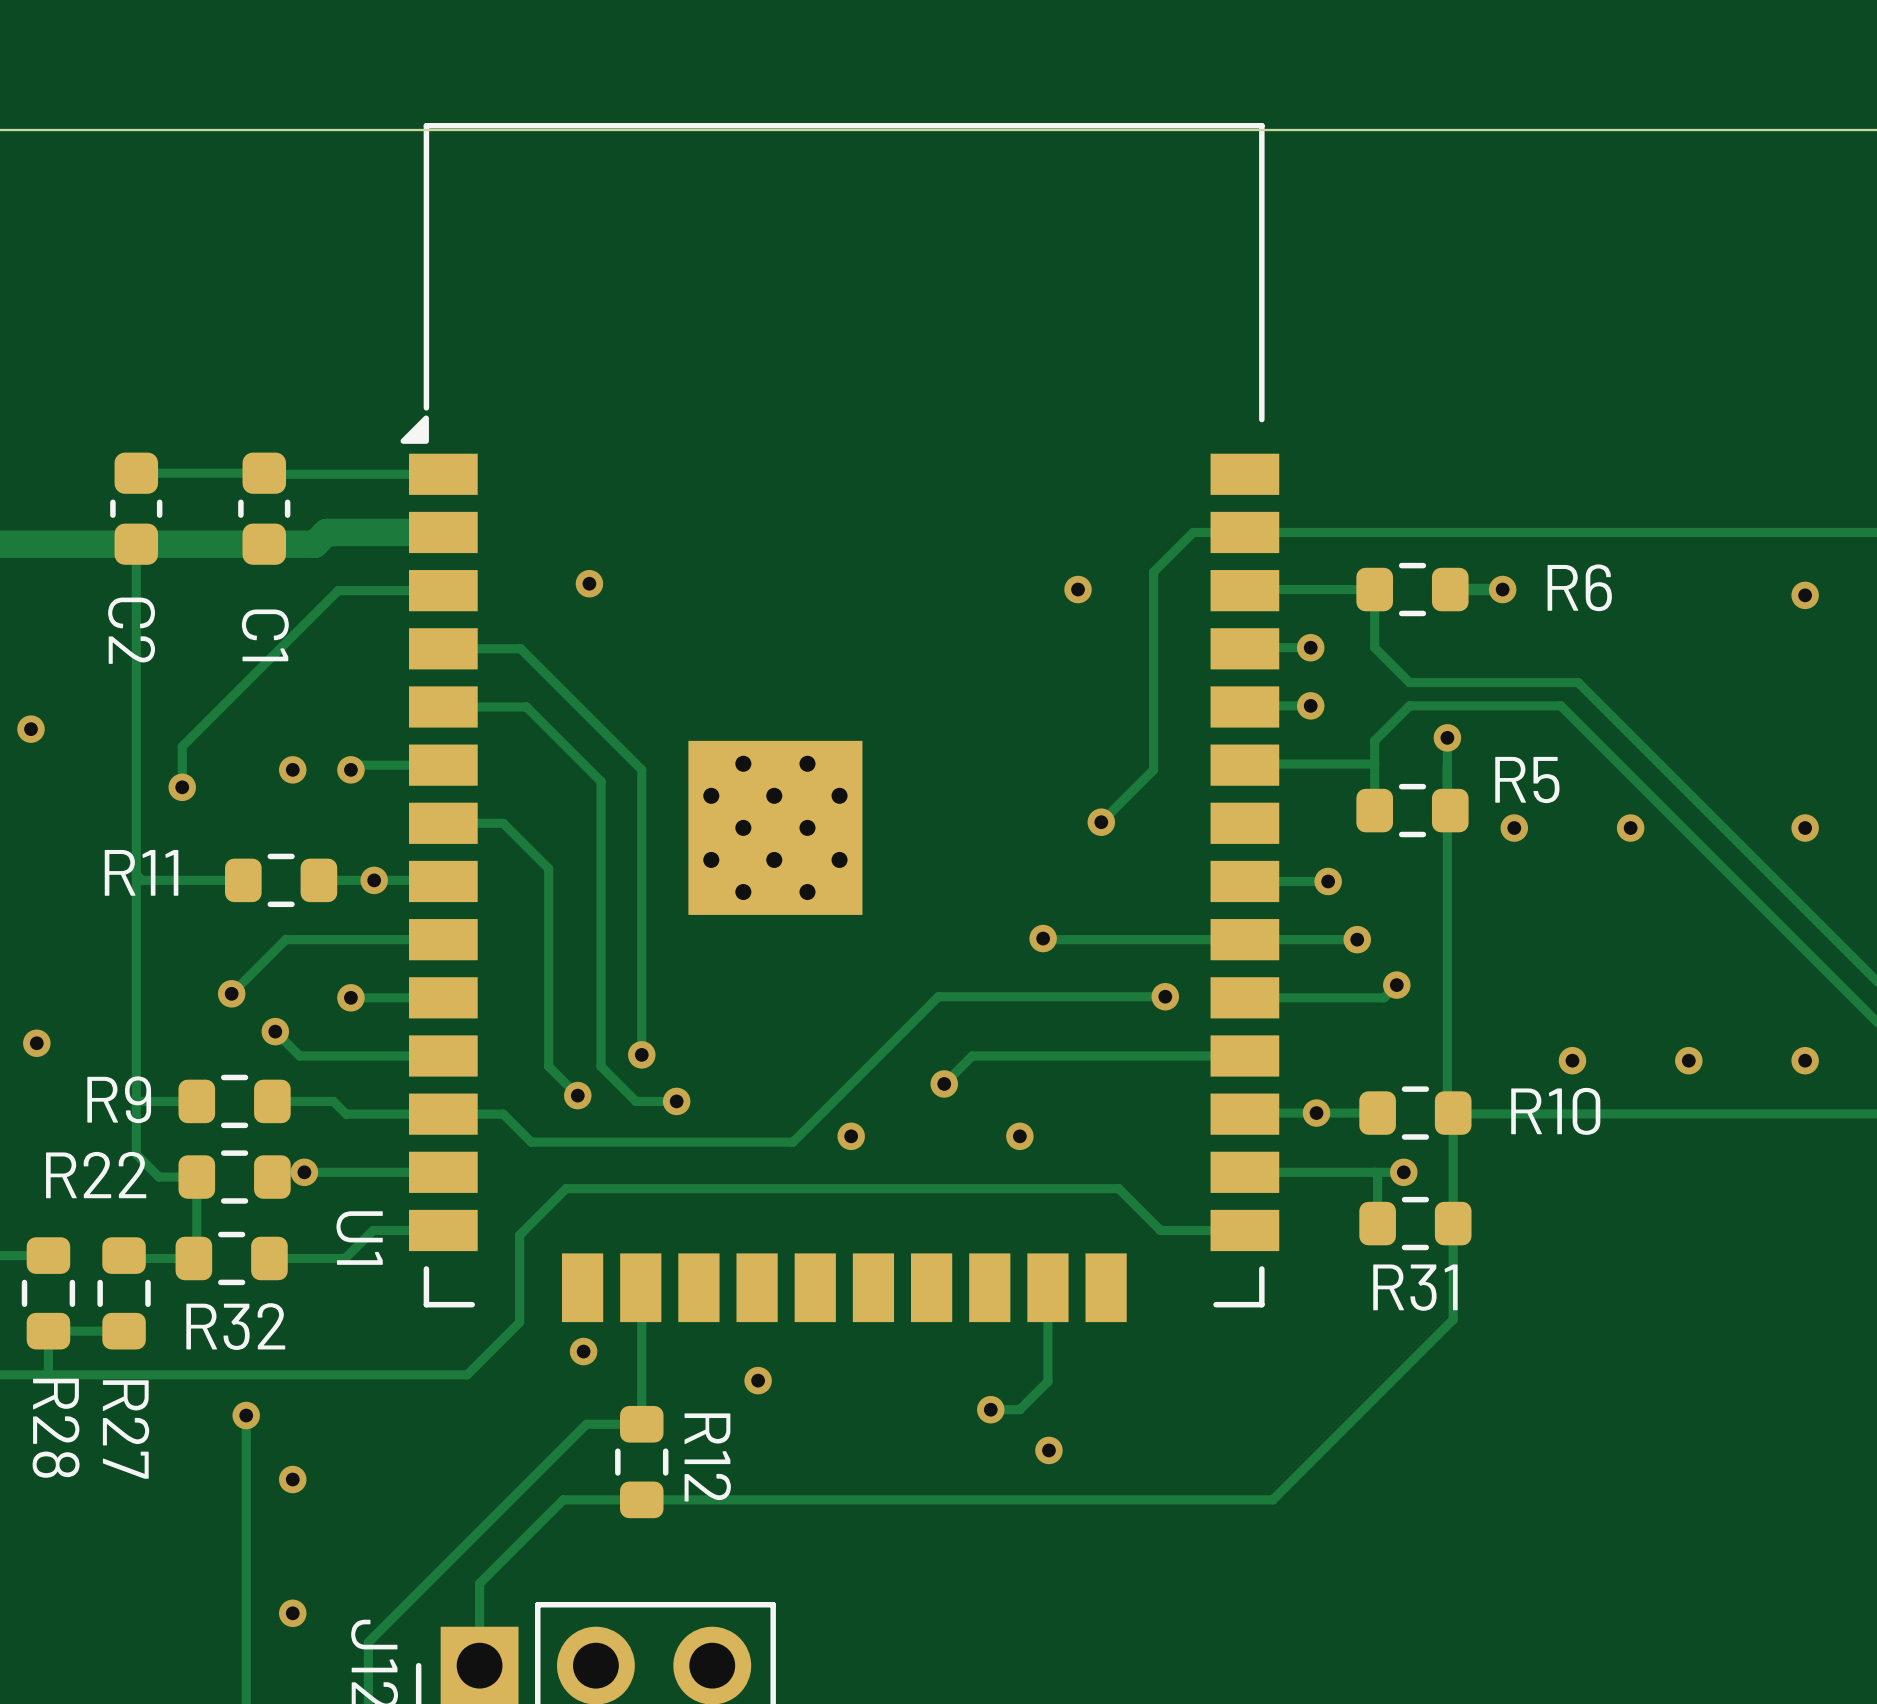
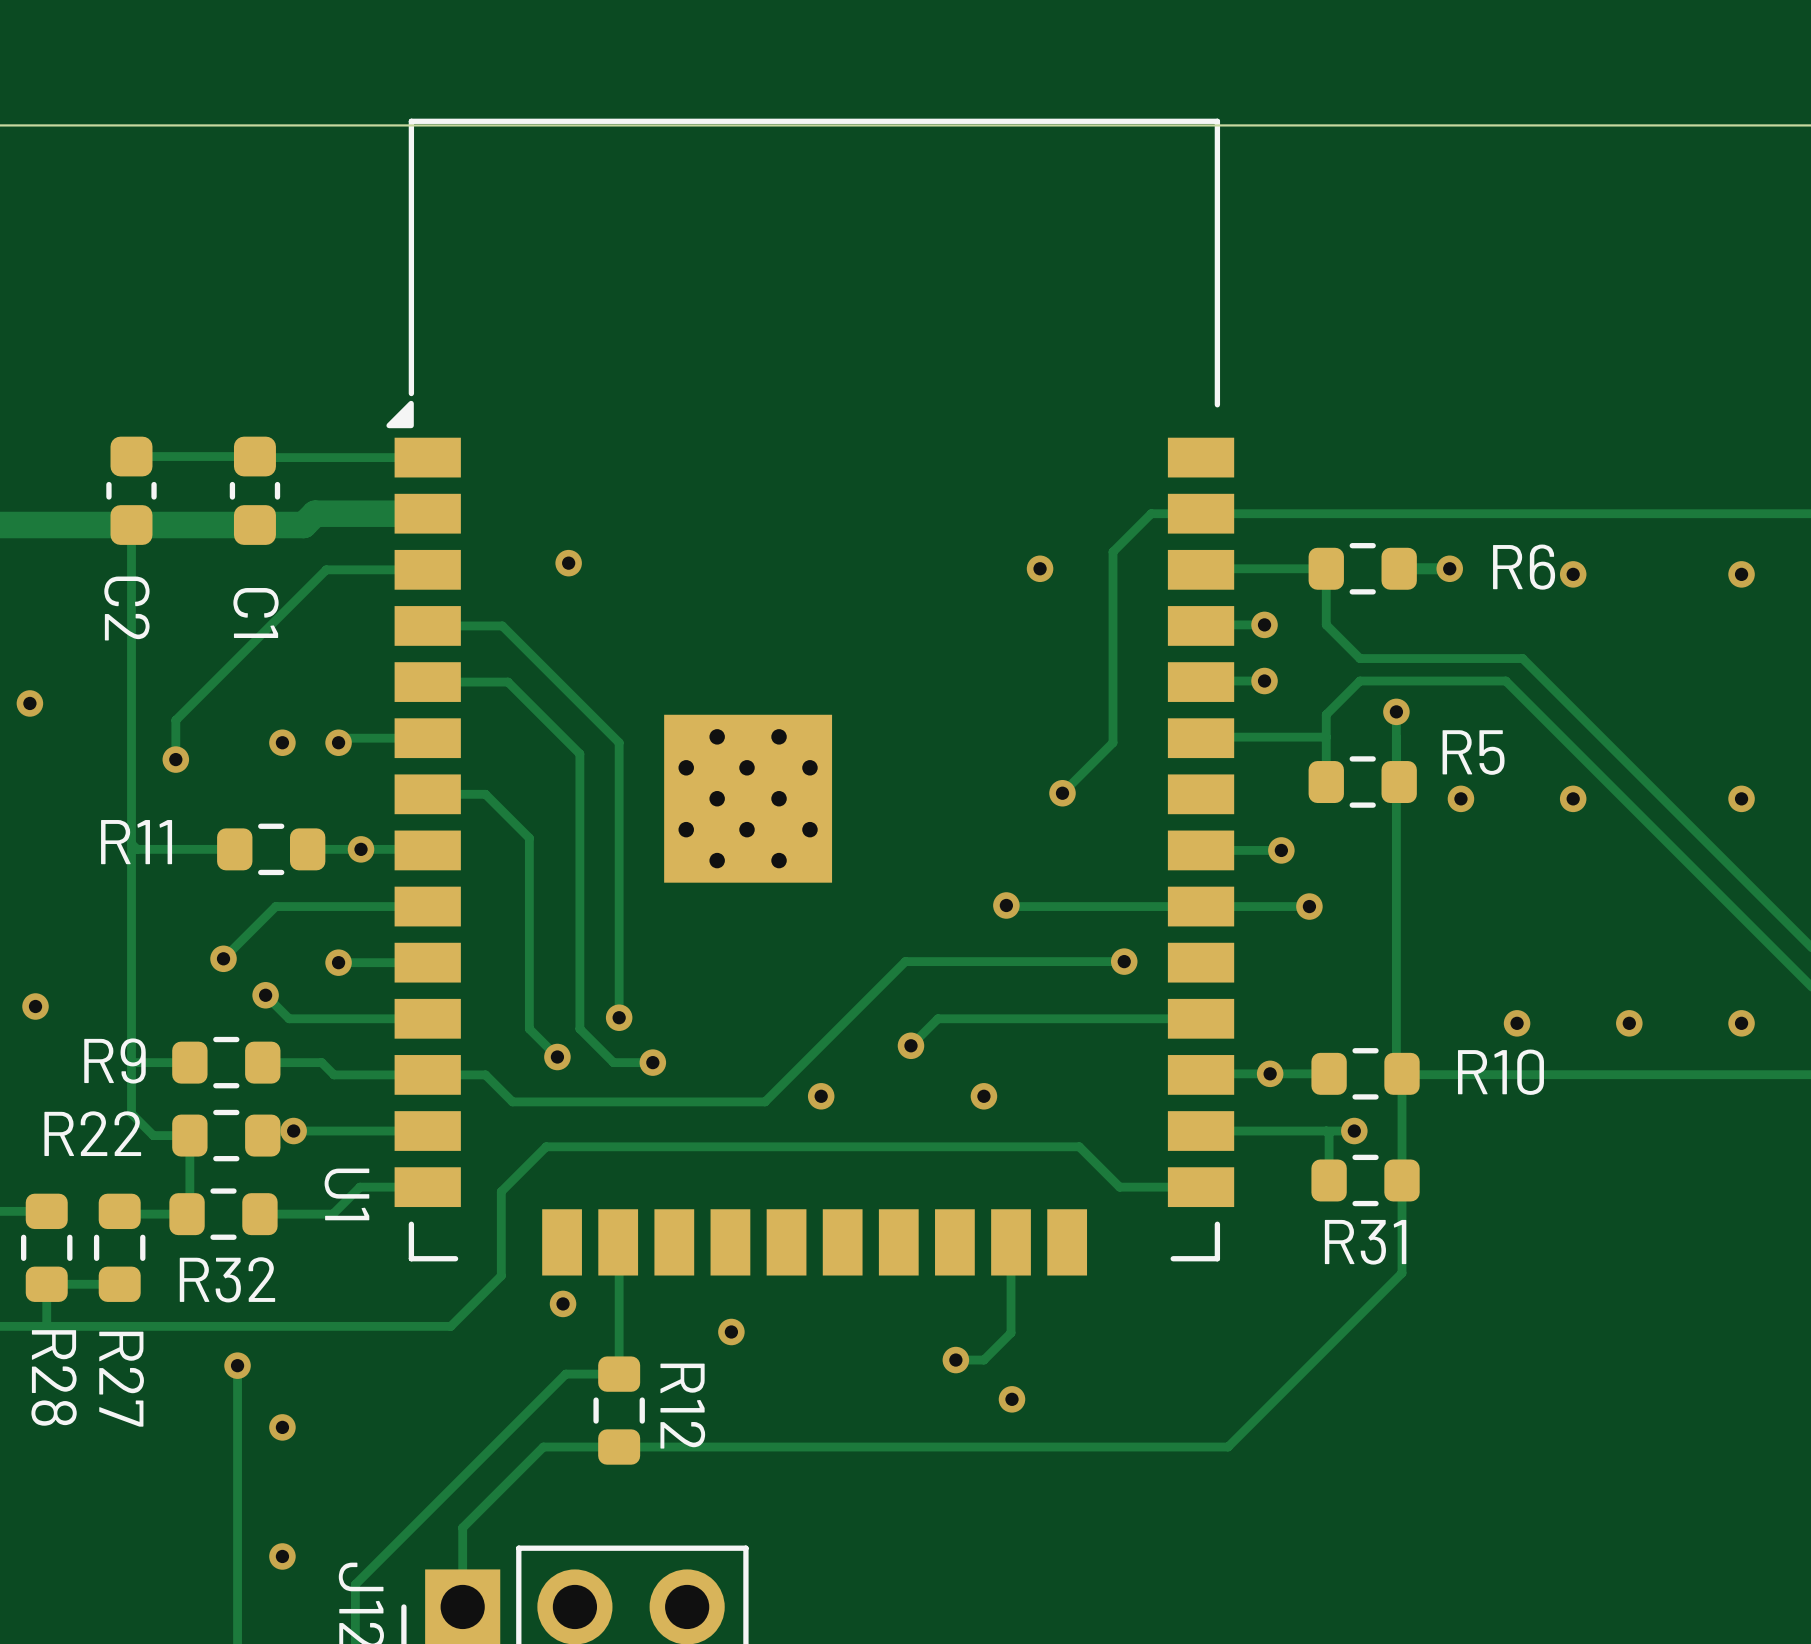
via: none -> (1573, 574)
track: (1396, 985) (1384, 997) (1244, 997) -> none
via: (1396, 985) -> none

